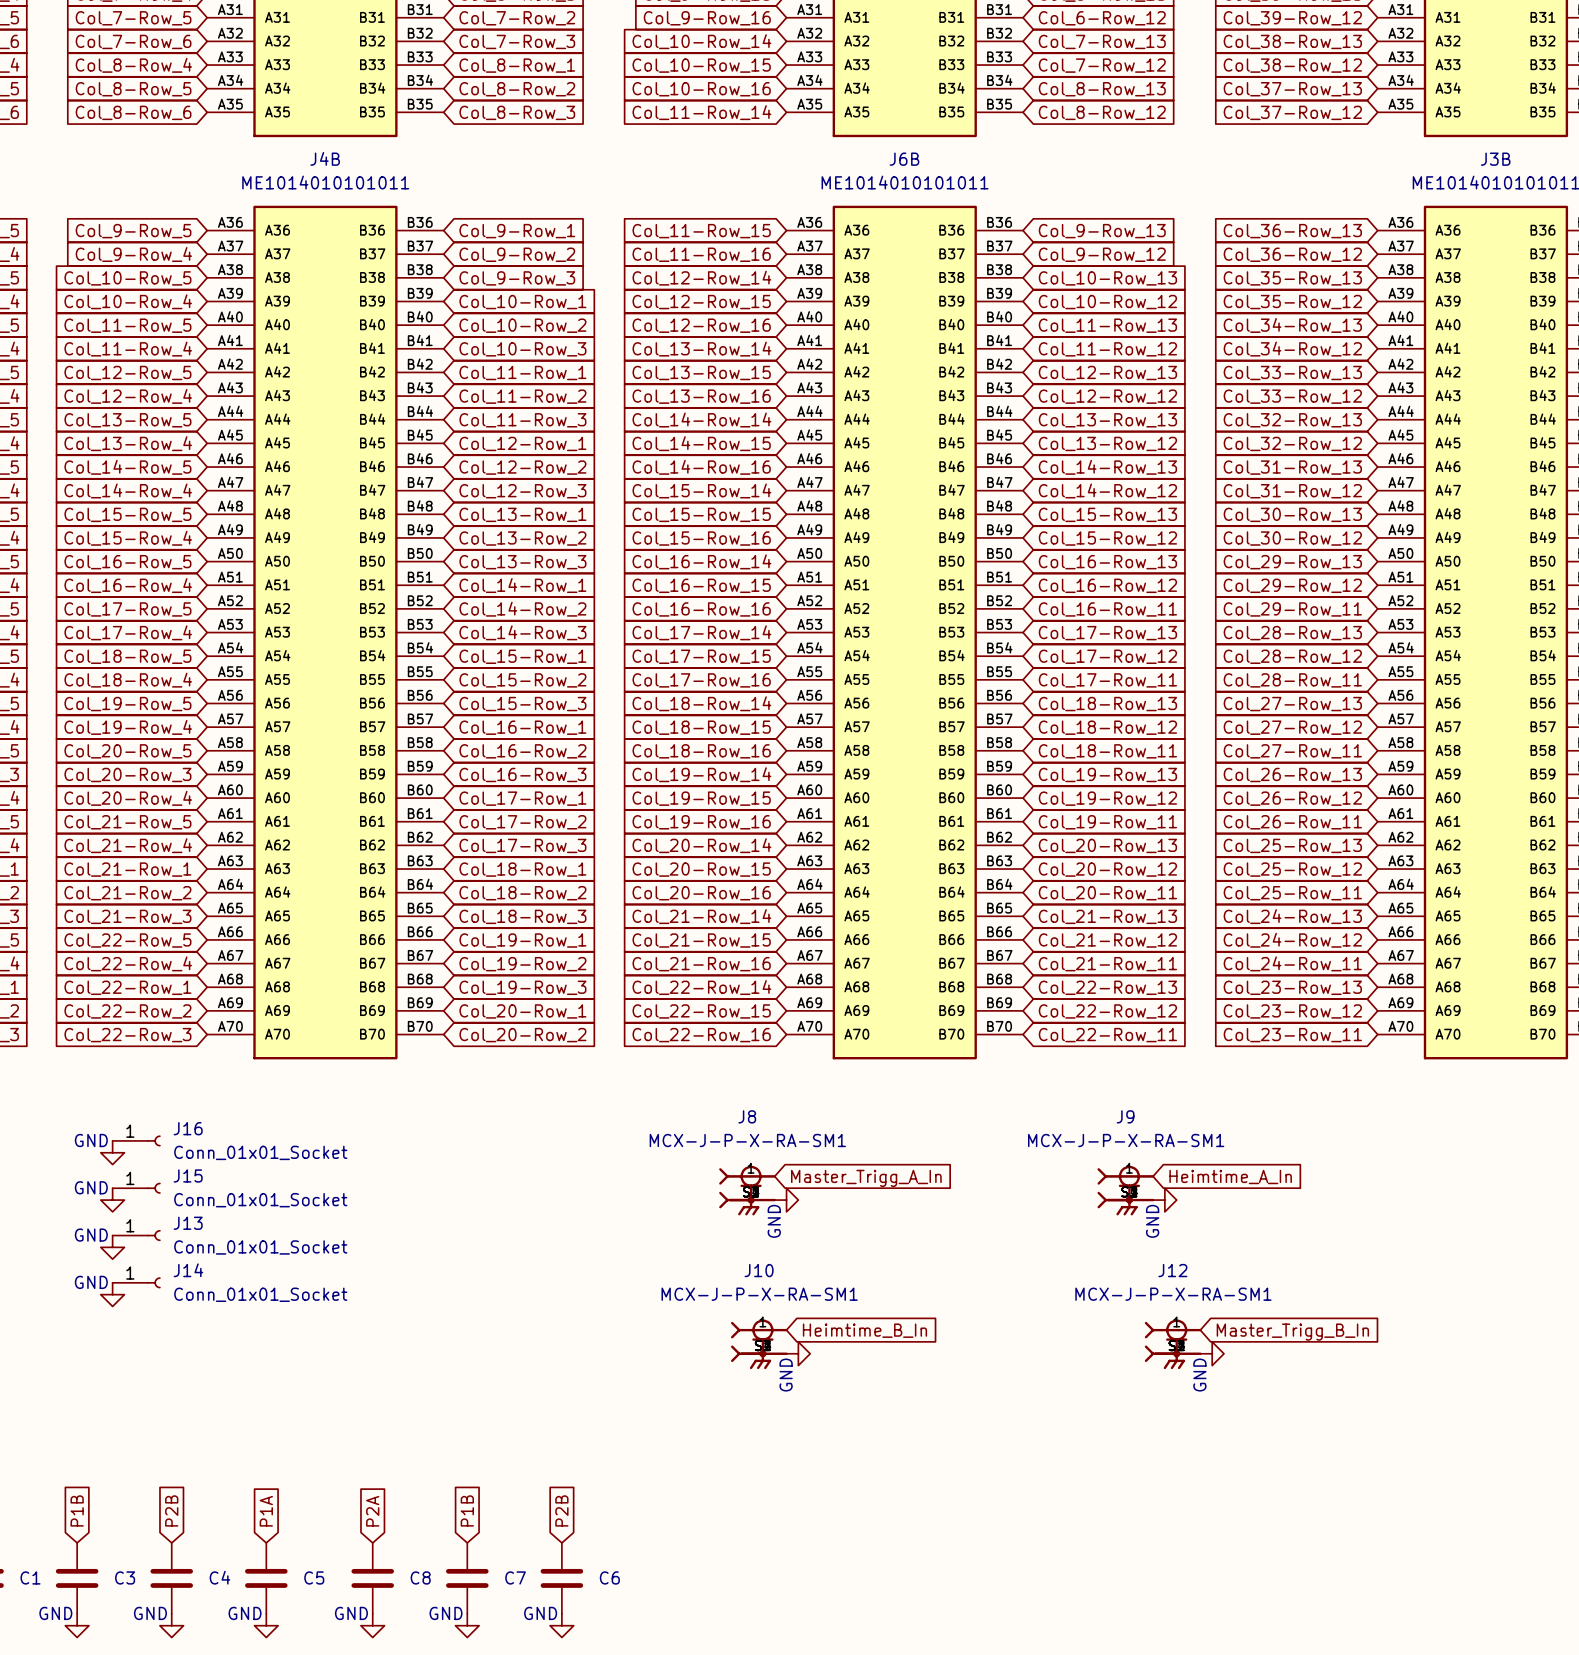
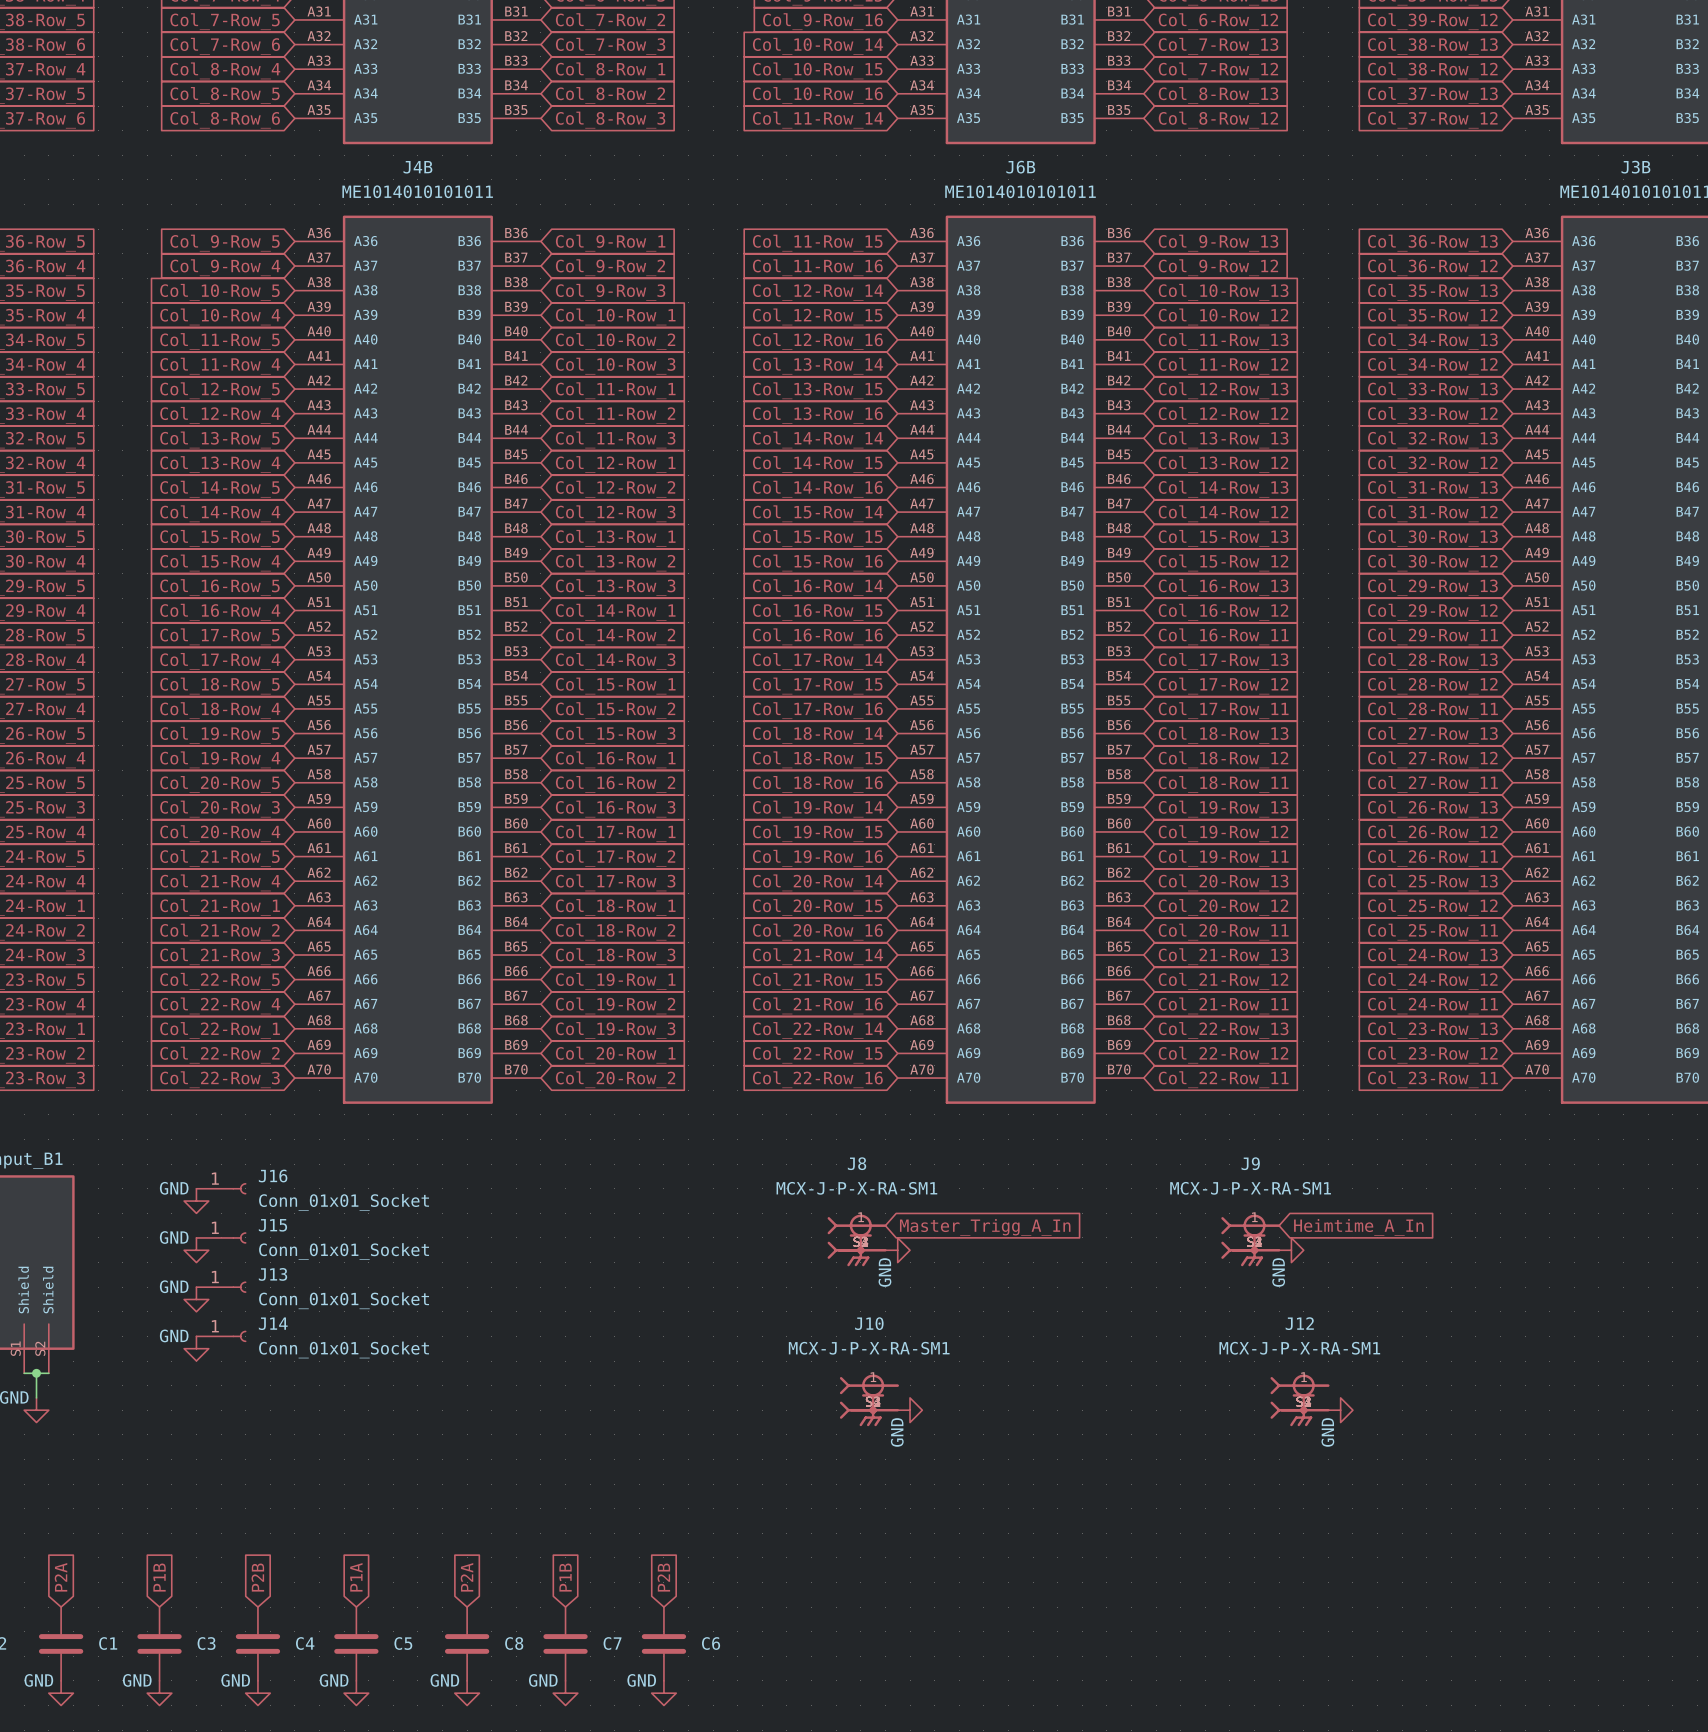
global label: Heimtime_B_In (864, 1330) -> none
global label: Master_Trigg_B_In (1292, 1332) -> none

